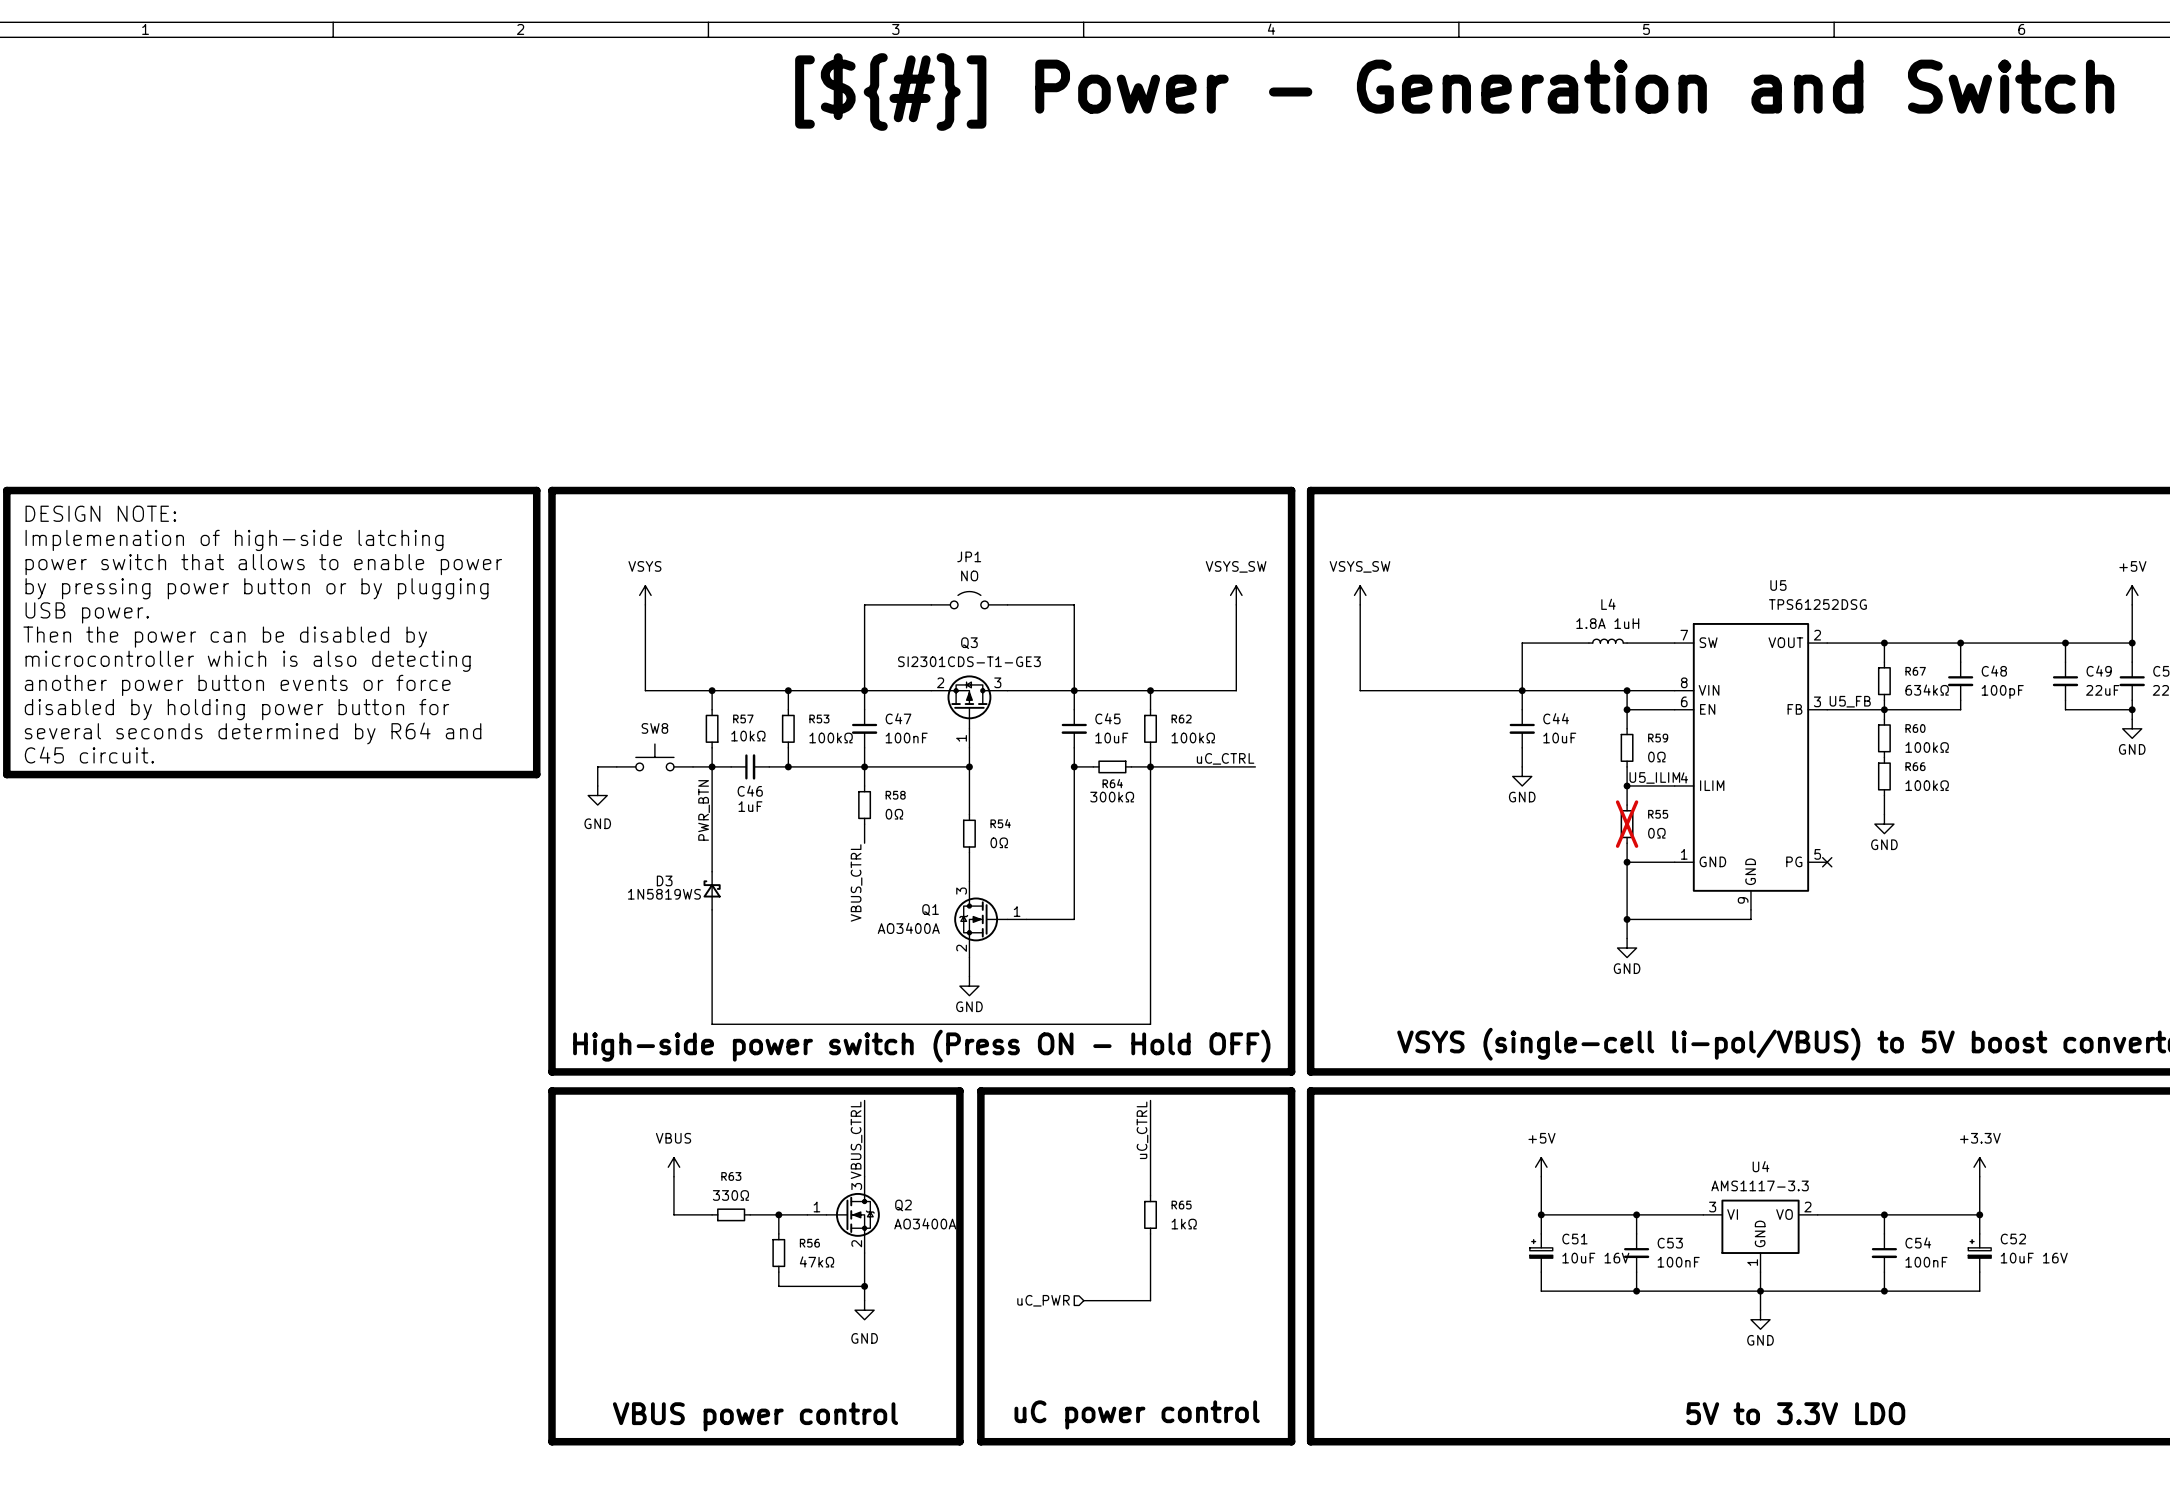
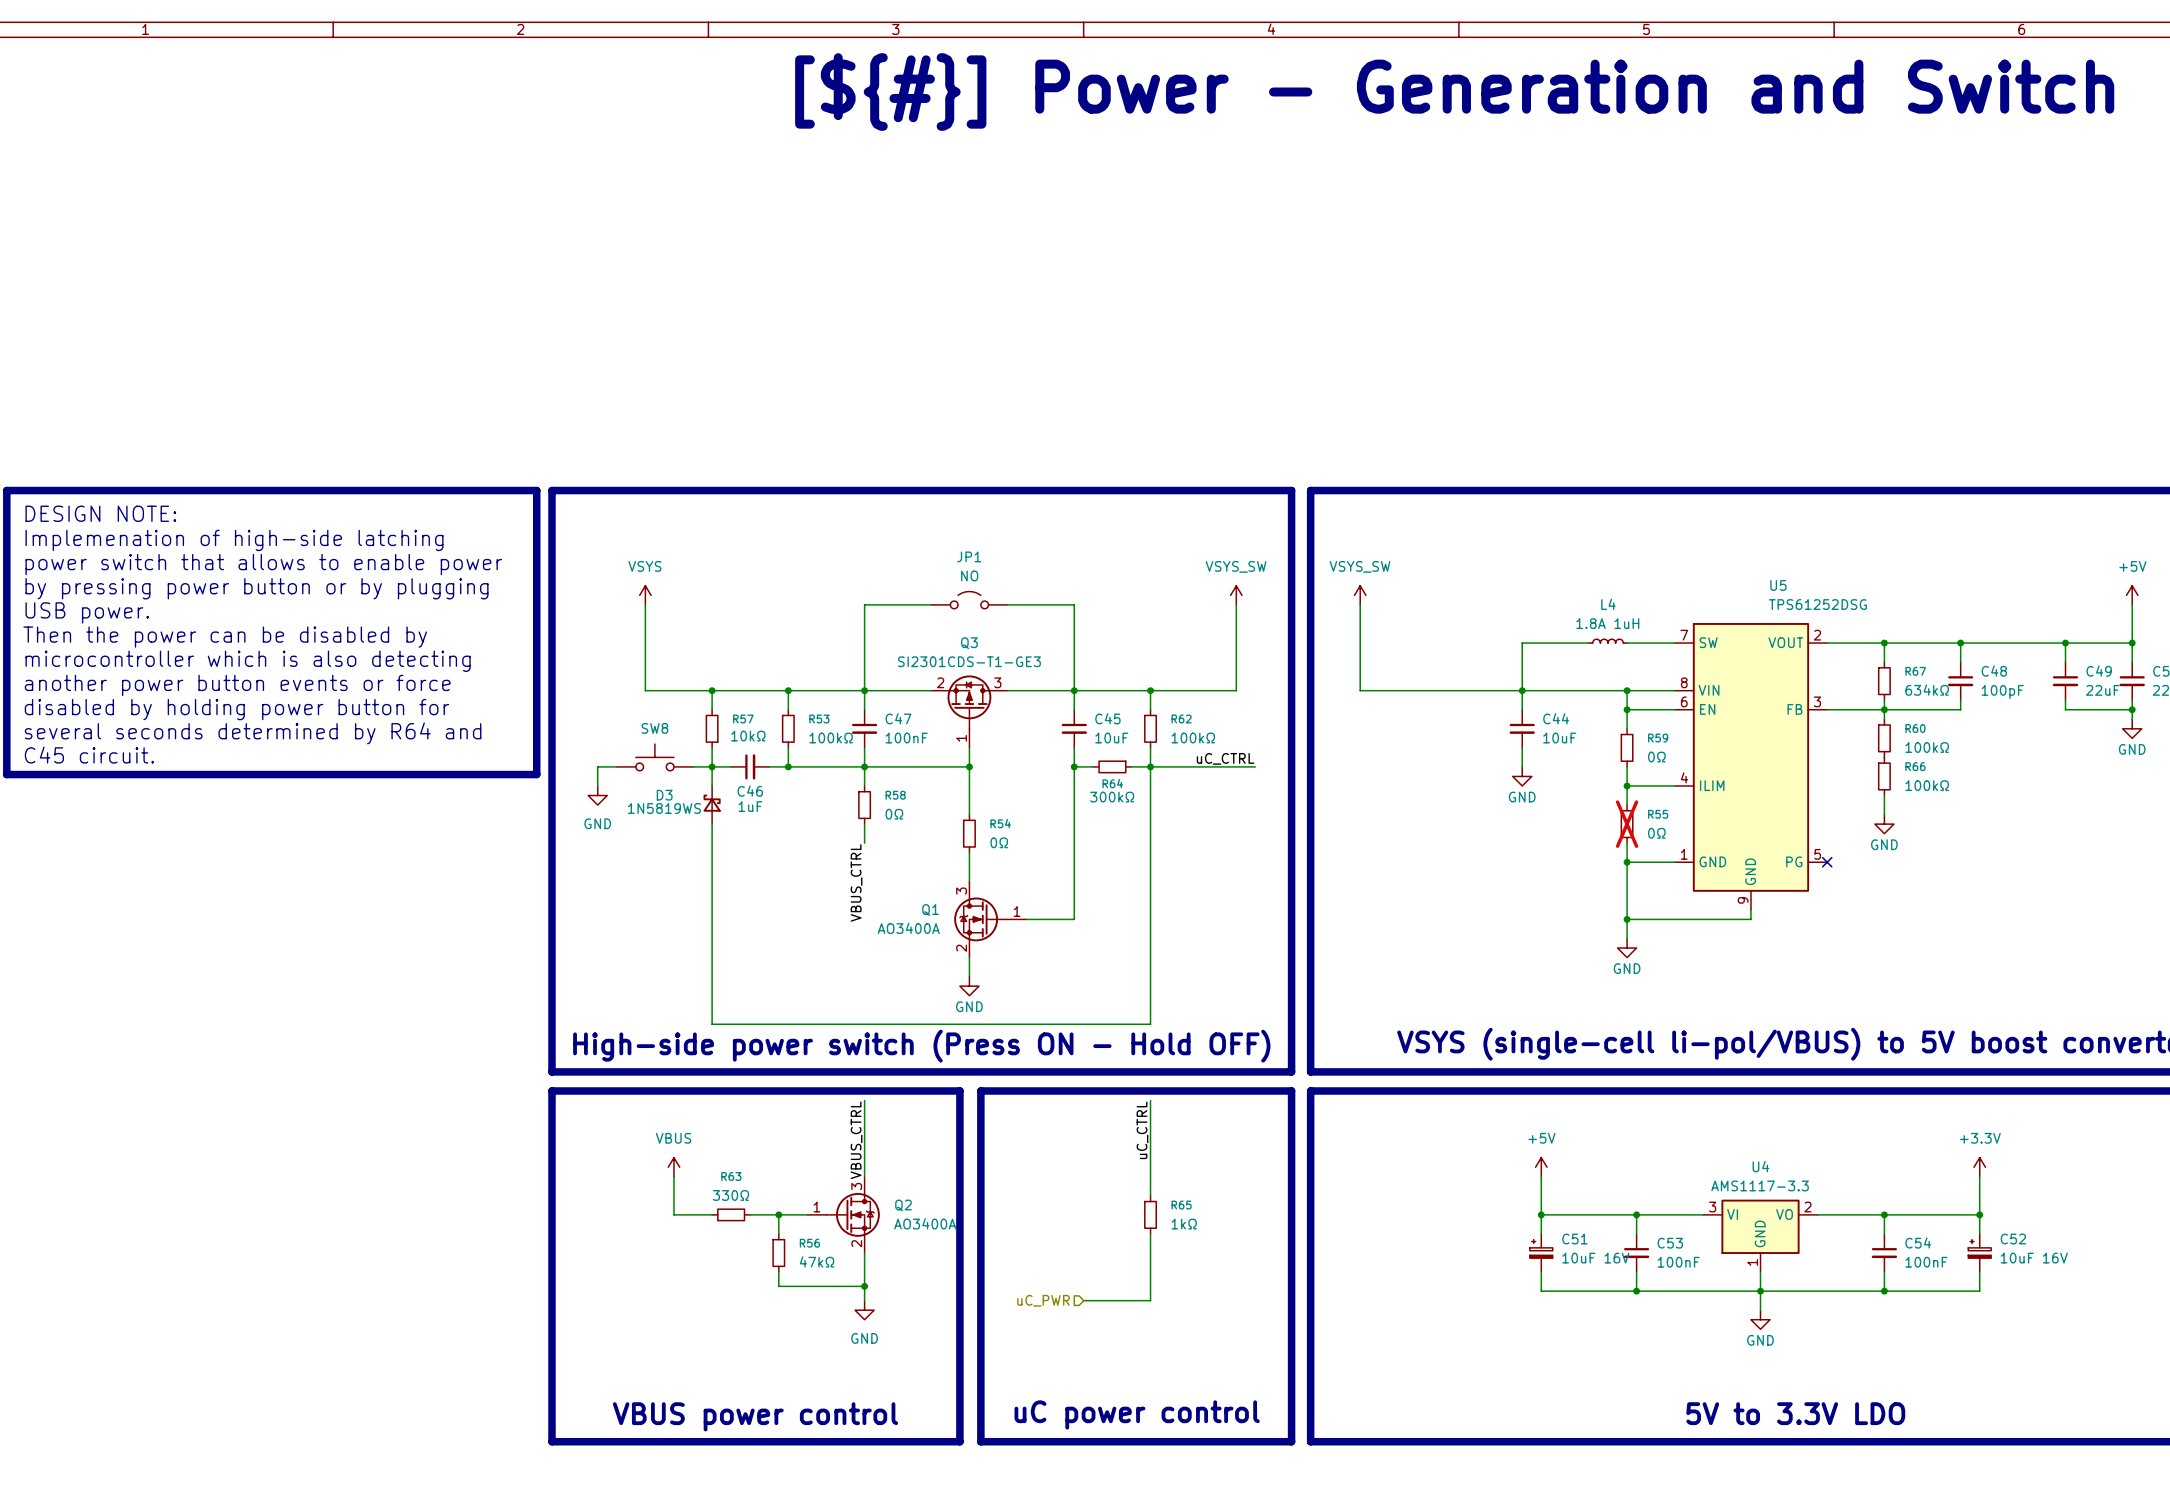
label: U5_FB (1850, 701) -> none
label: U5_ILIM (1654, 777) -> none
label: PWR_BTN (704, 810) -> none
D3 position: (712, 890) -> (712, 805)

